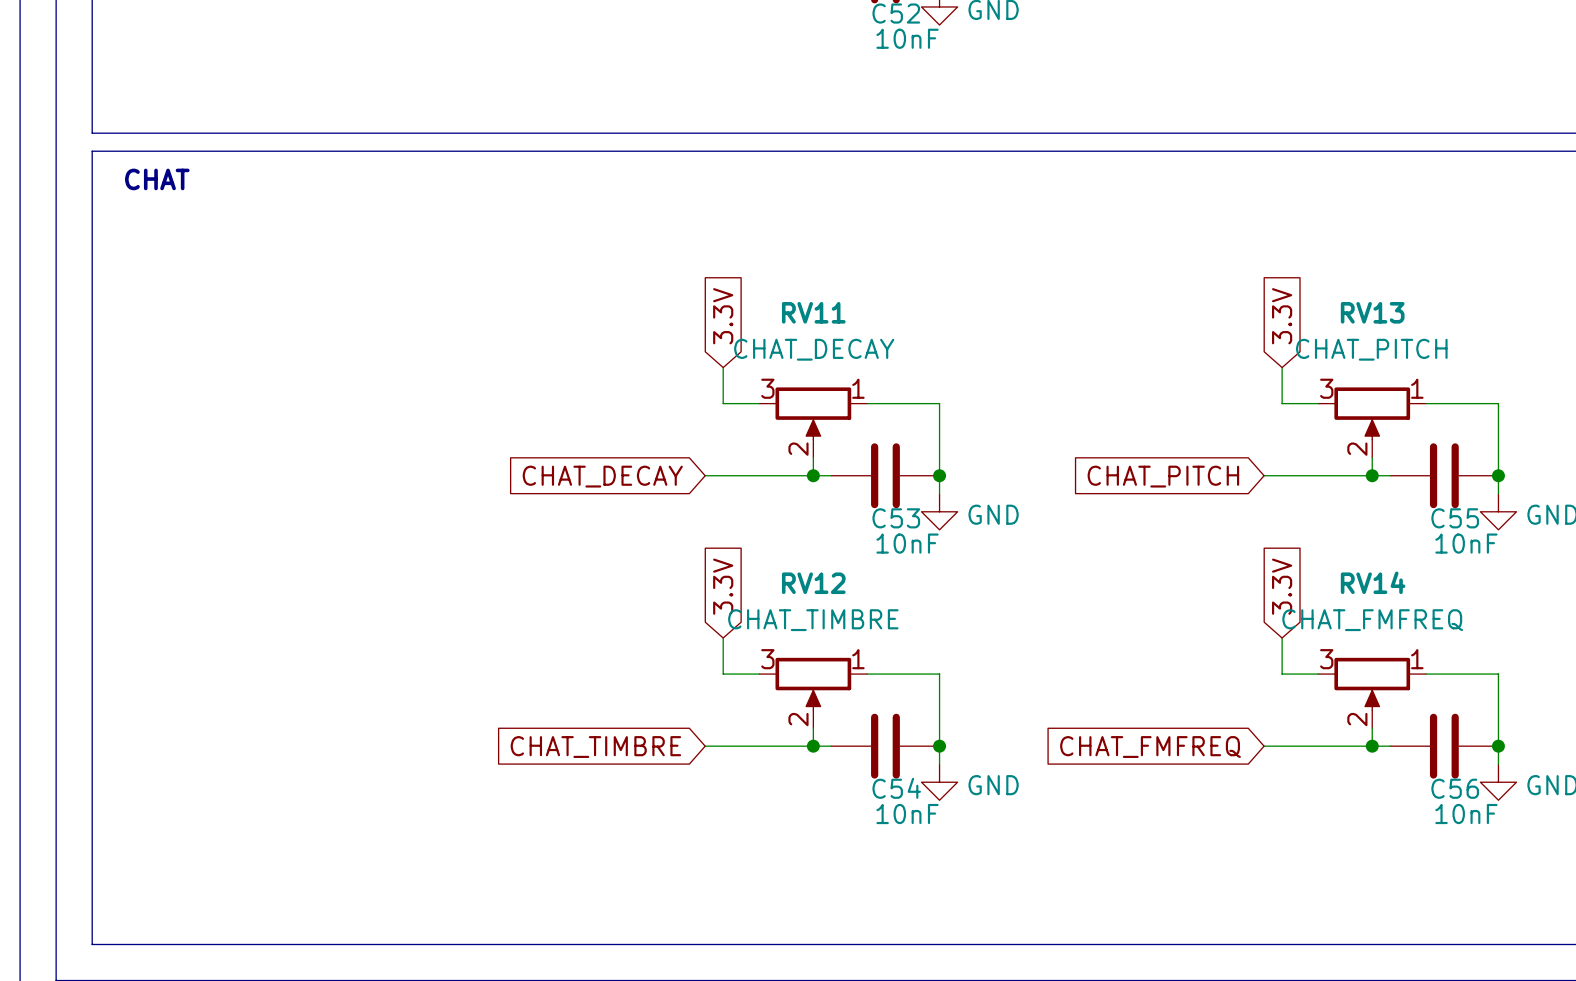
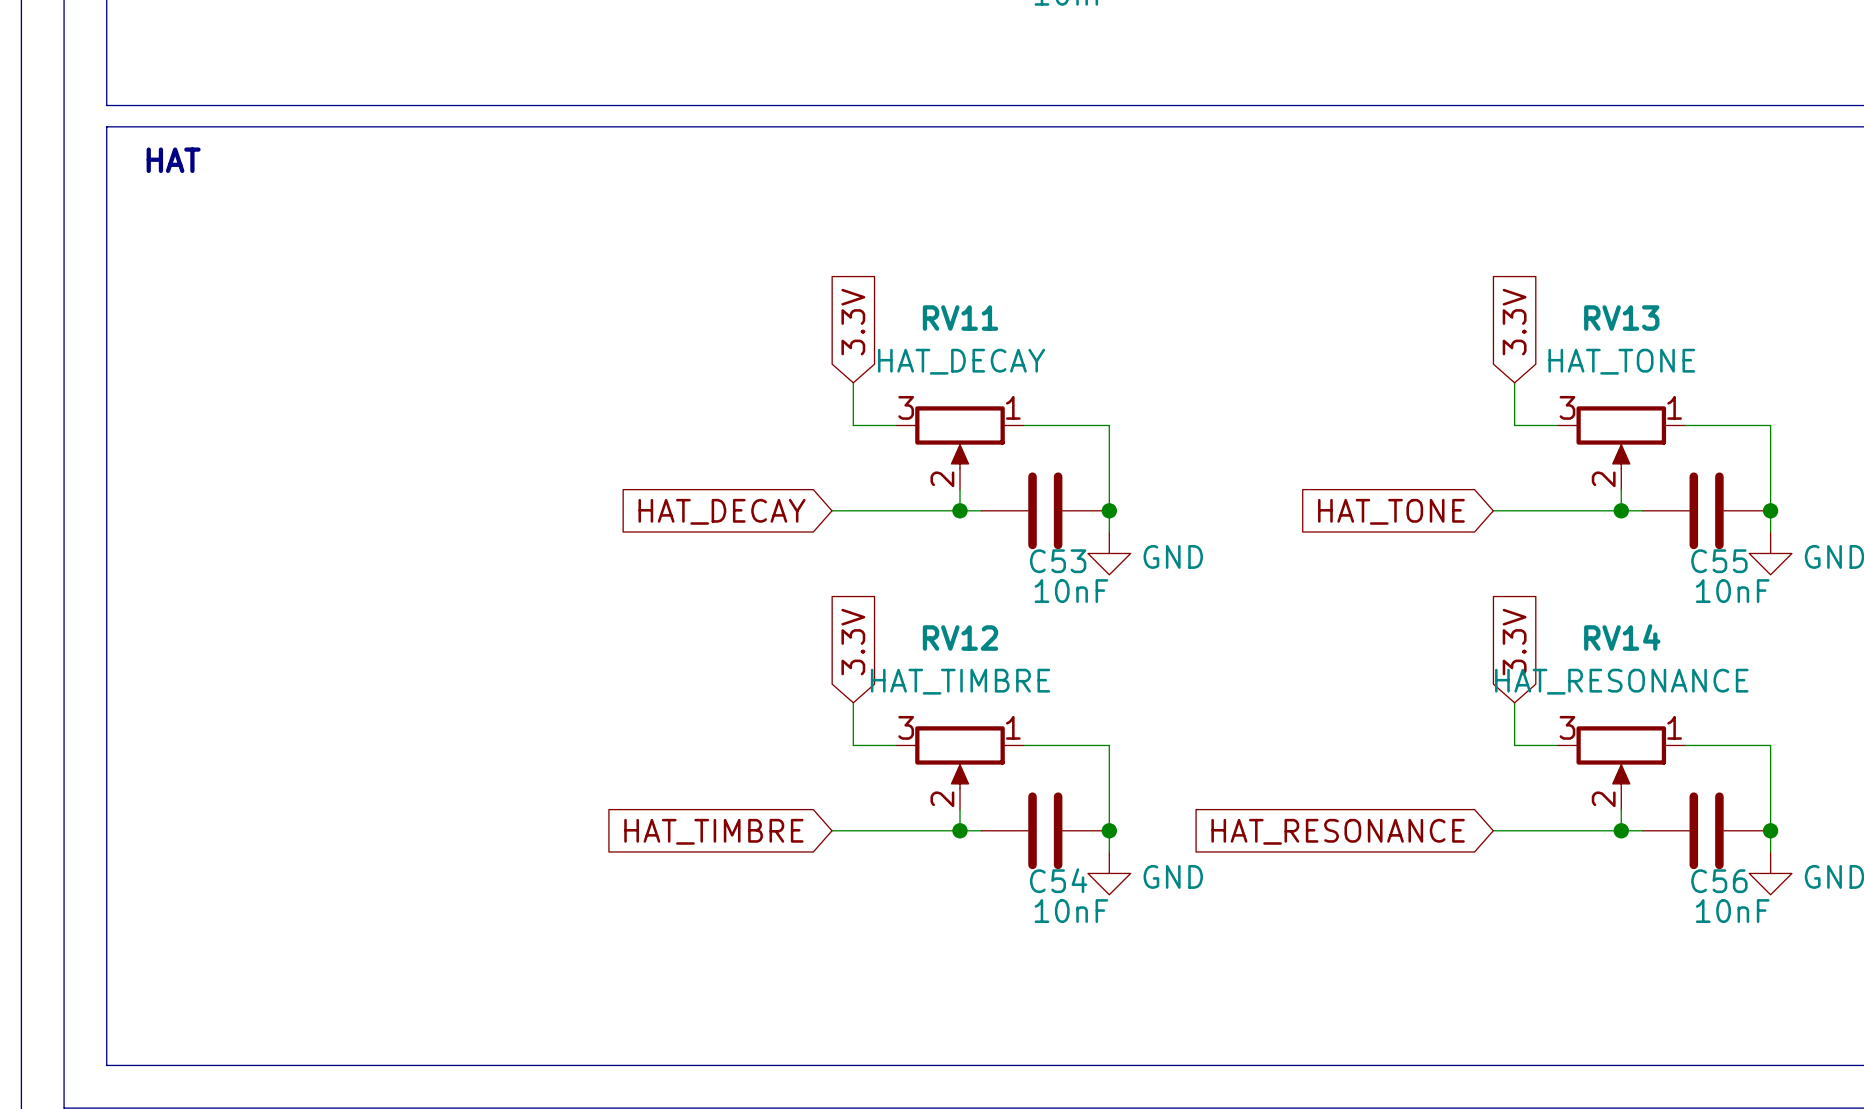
text: CHAT (157, 179) -> HAT (173, 160)
RV11 value: CHAT_DECAY (814, 349) -> HAT_DECAY (961, 361)
RV13 value: CHAT_PITCH (1371, 349) -> HAT_TONE (1621, 361)
global label: CHAT_DECAY (602, 476) -> HAT_DECAY (722, 511)
global label: CHAT_PITCH (1163, 476) -> HAT_TONE (1391, 511)
RV12 value: CHAT_TIMBRE (813, 620) -> HAT_TIMBRE (960, 681)
RV14 value: CHAT_FMFREQ (1372, 620) -> HAT_RESONANCE (1621, 681)
global label: CHAT_TIMBRE (595, 747) -> HAT_TIMBRE (713, 831)
global label: CHAT_FMFREQ (1150, 747) -> HAT_RESONANCE (1338, 831)

